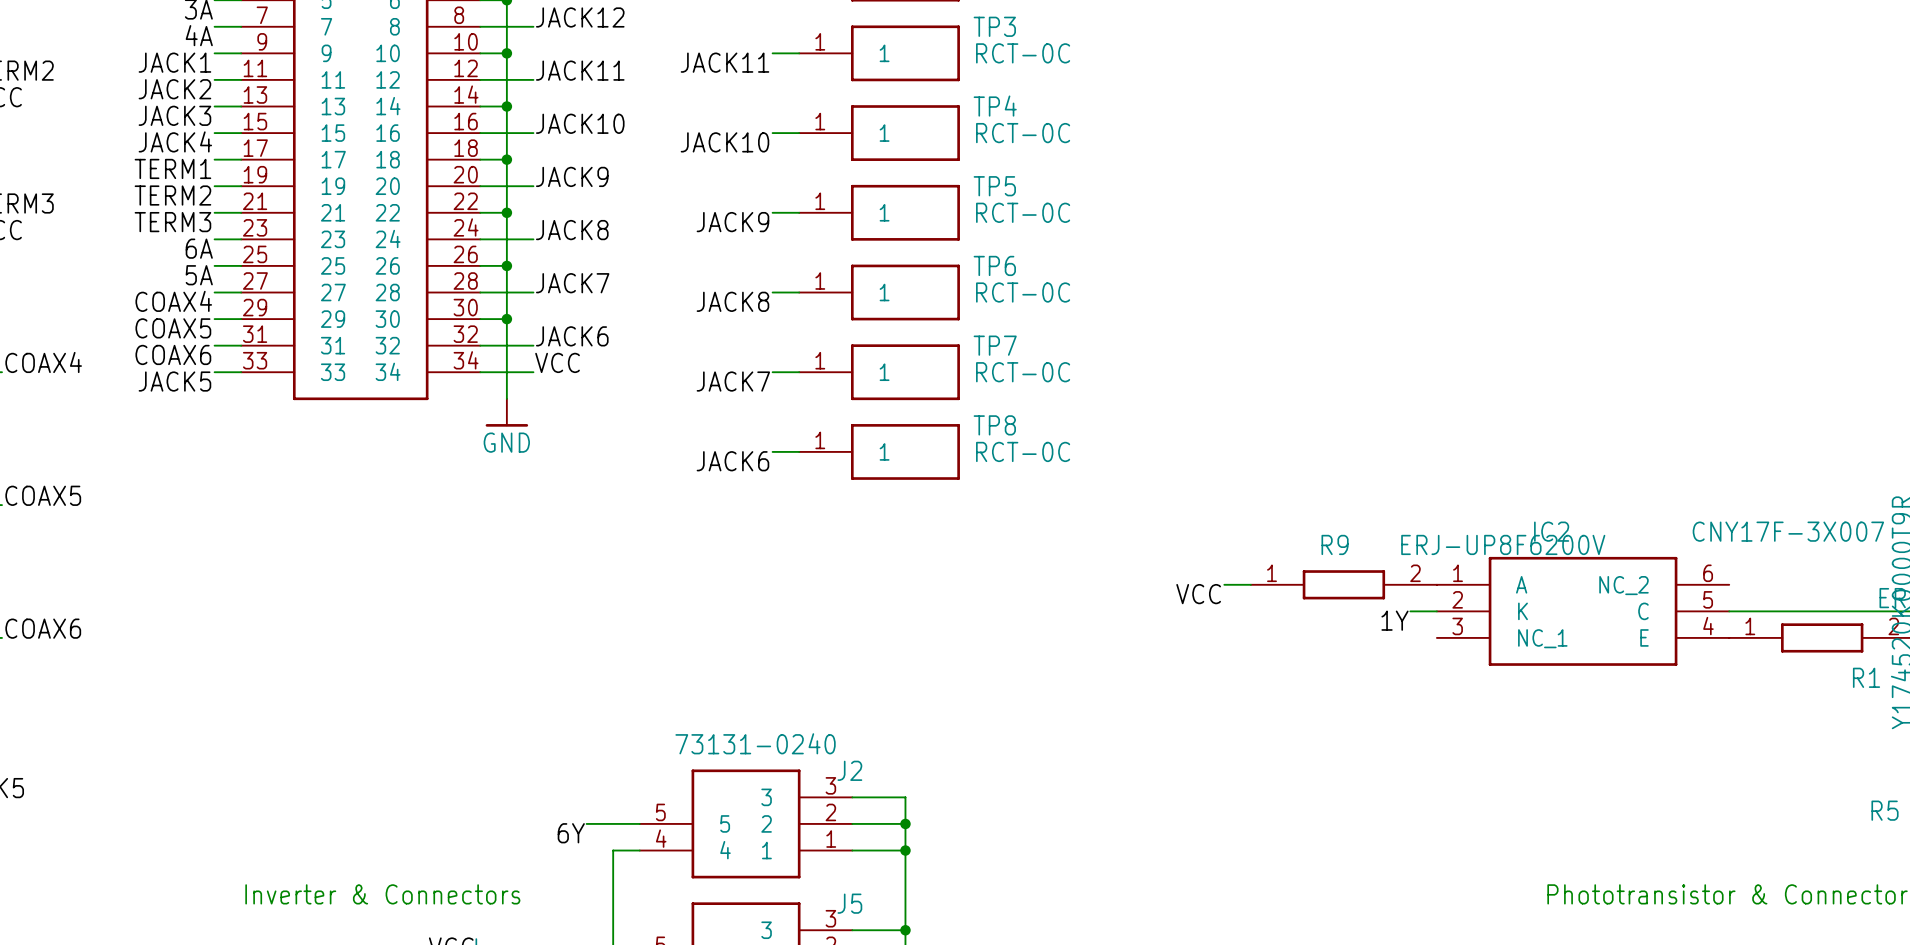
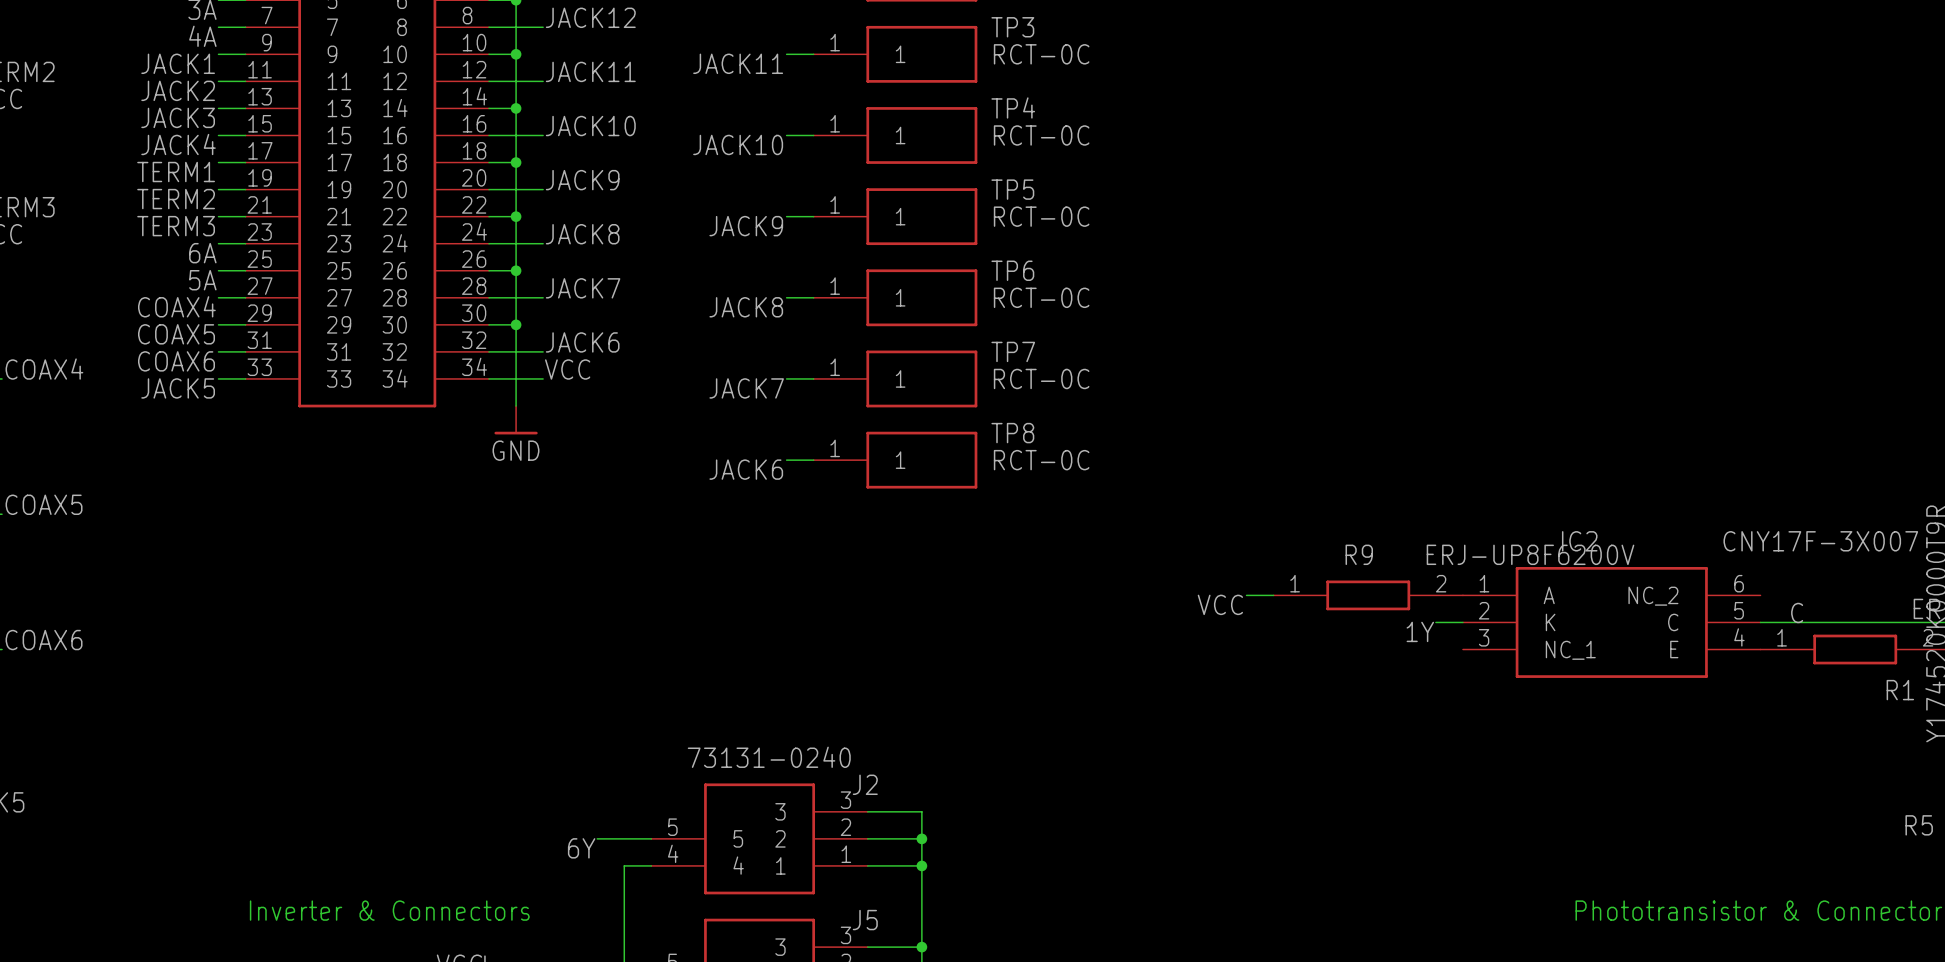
label: none -> C (1797, 612)

